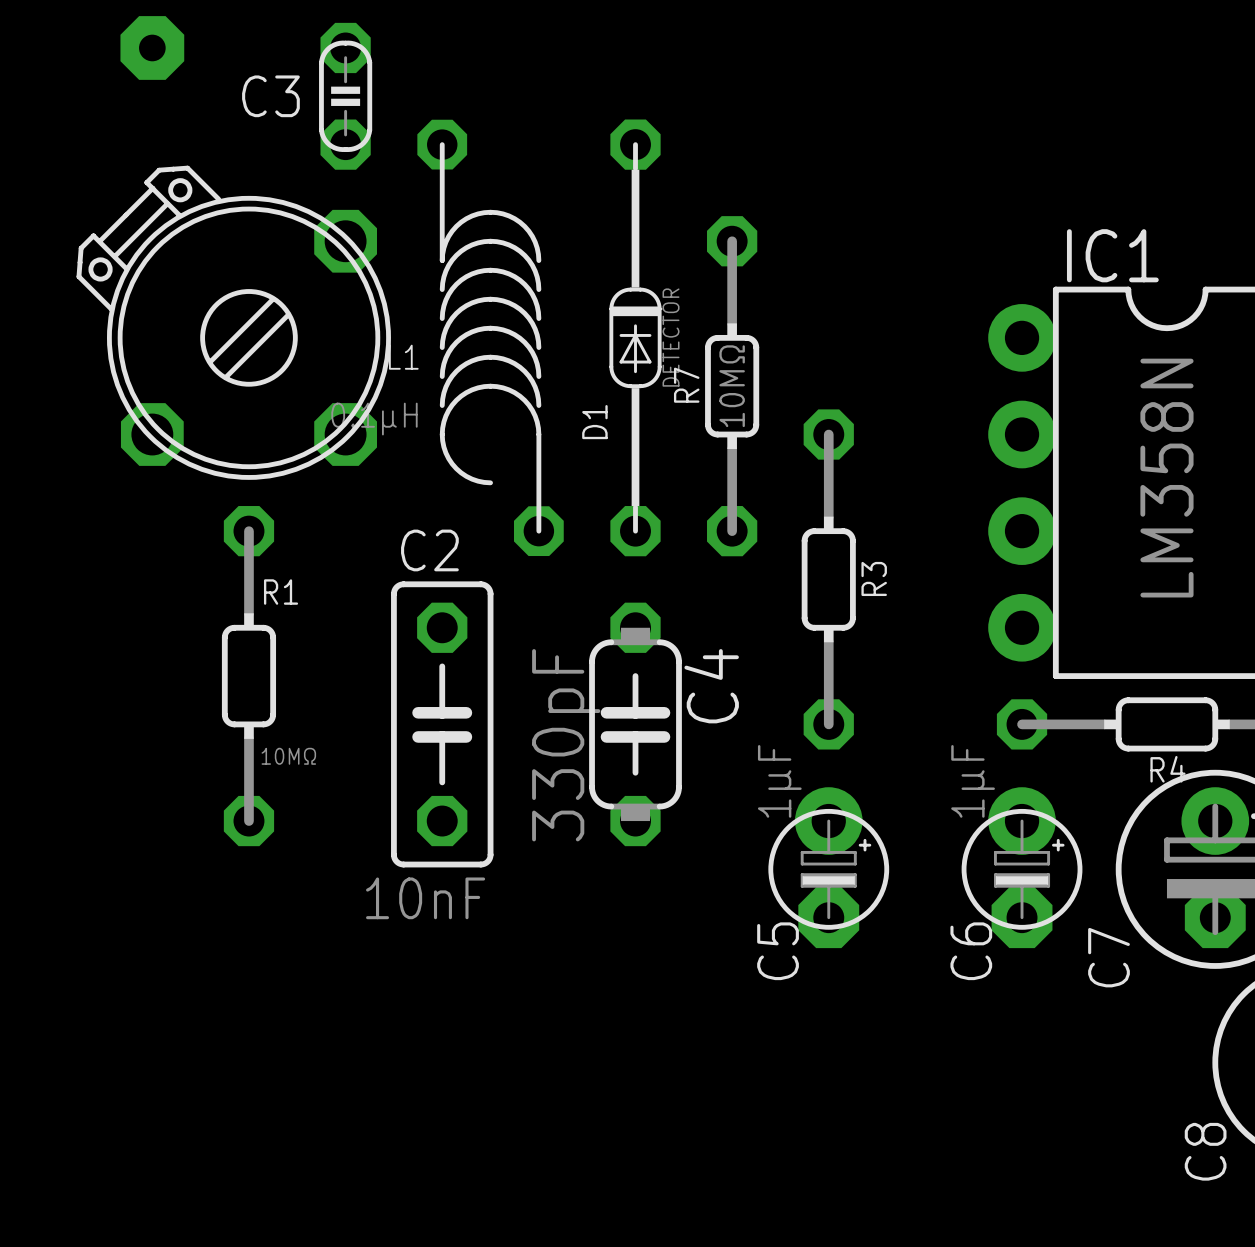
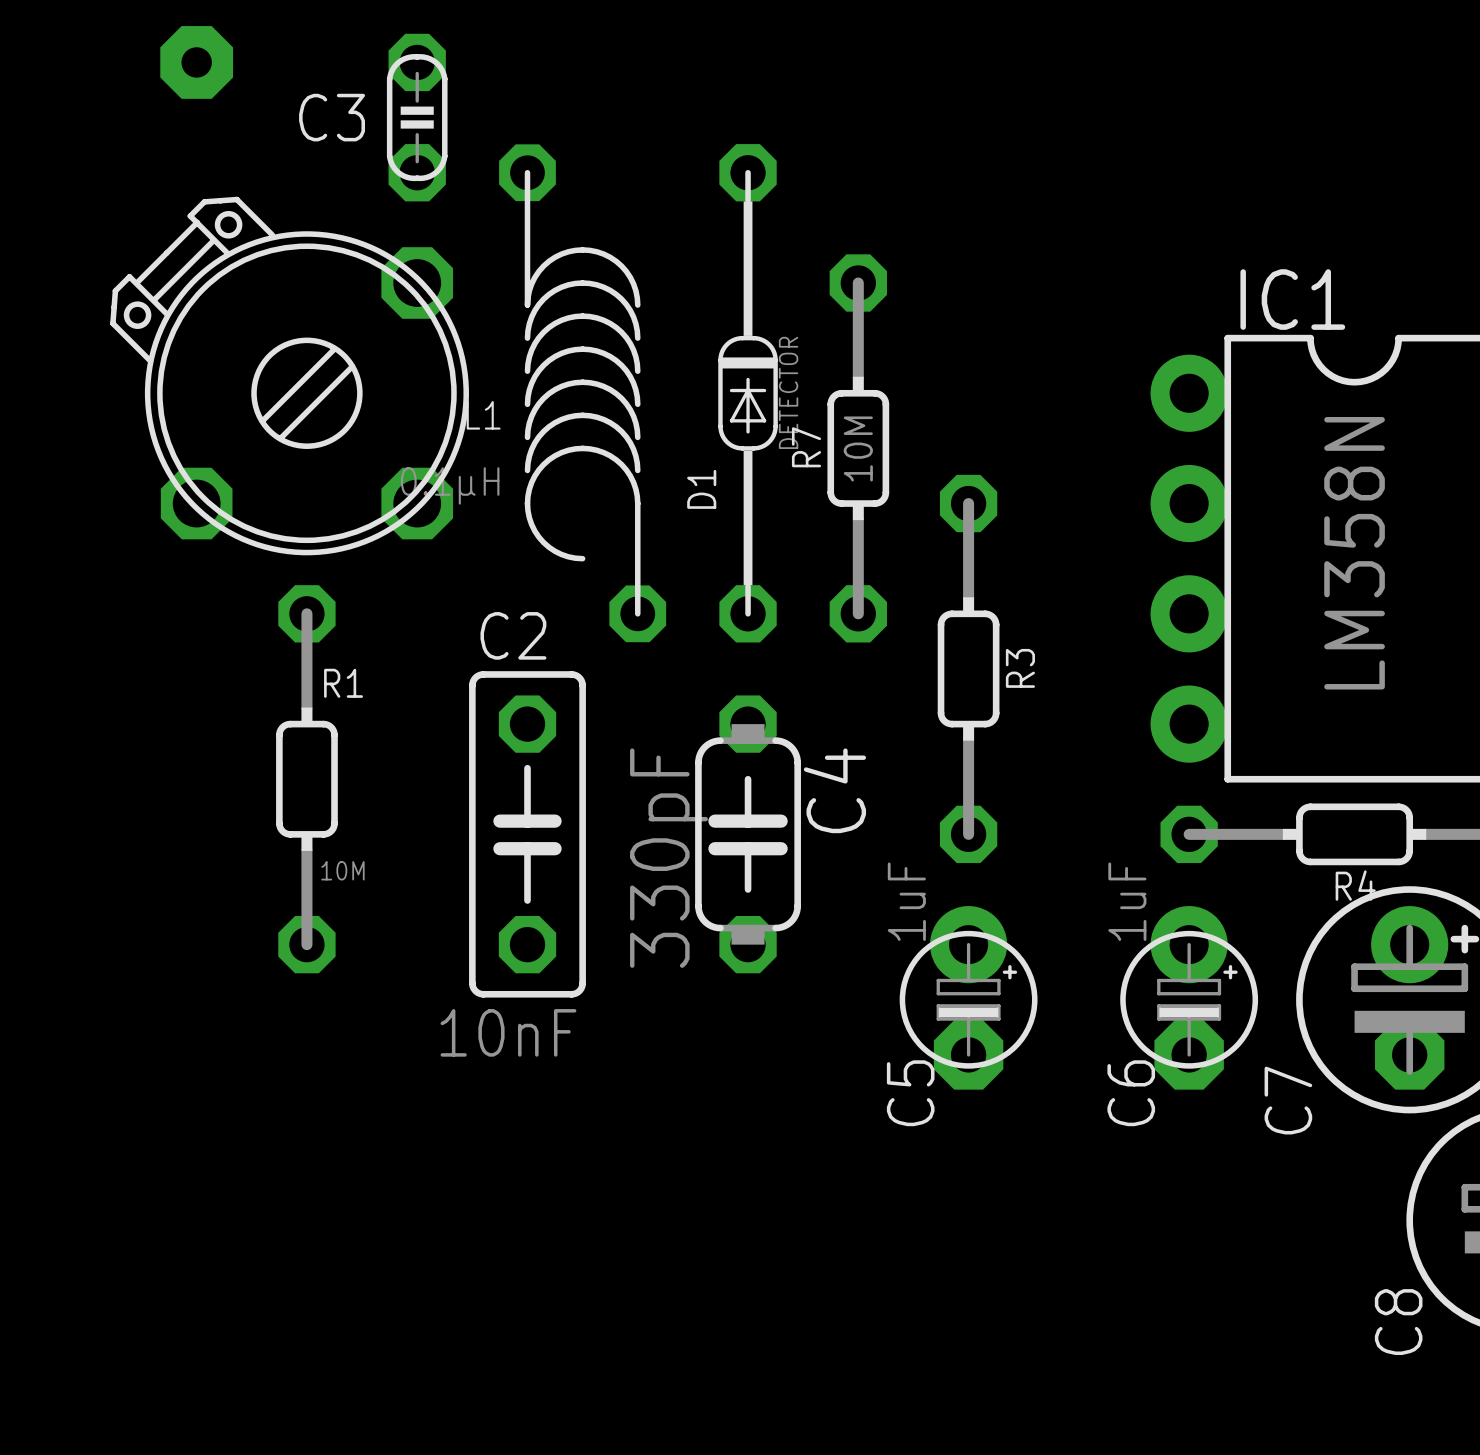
R7 value: 10MΩ (732, 386) -> 10M (858, 448)
R1 value: 10MΩ (288, 756) -> 10M (342, 870)
C5 value: 1μF (779, 781) -> 1uF (906, 901)
C6 value: 1μF (973, 781) -> 1uF (1127, 901)

